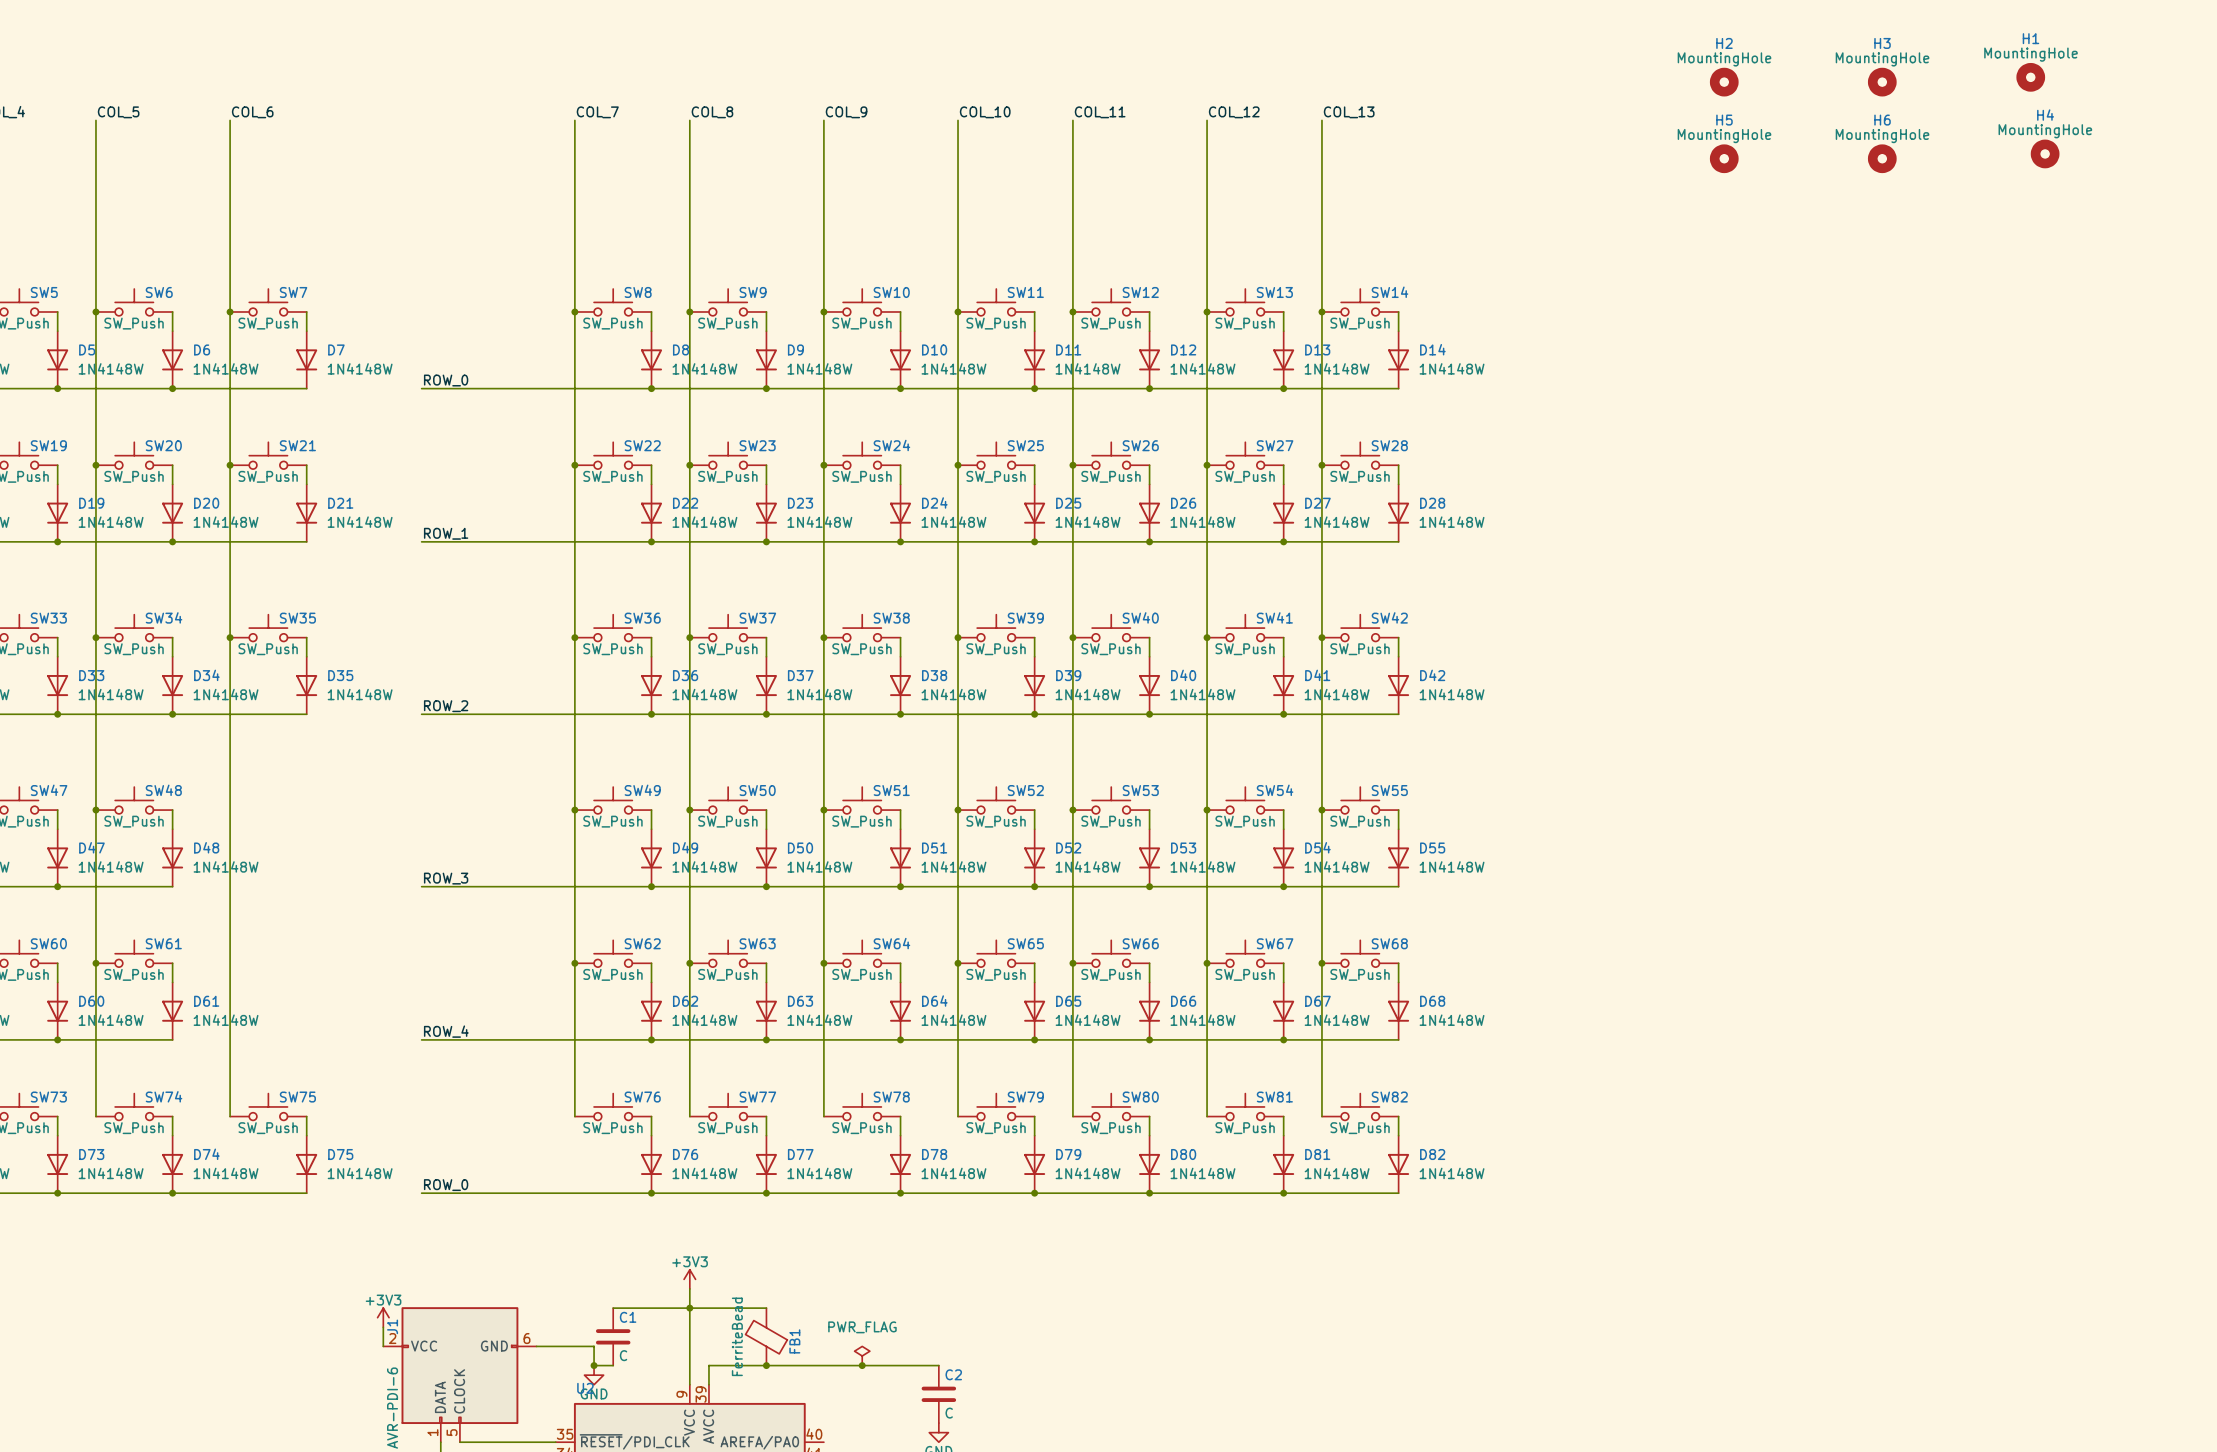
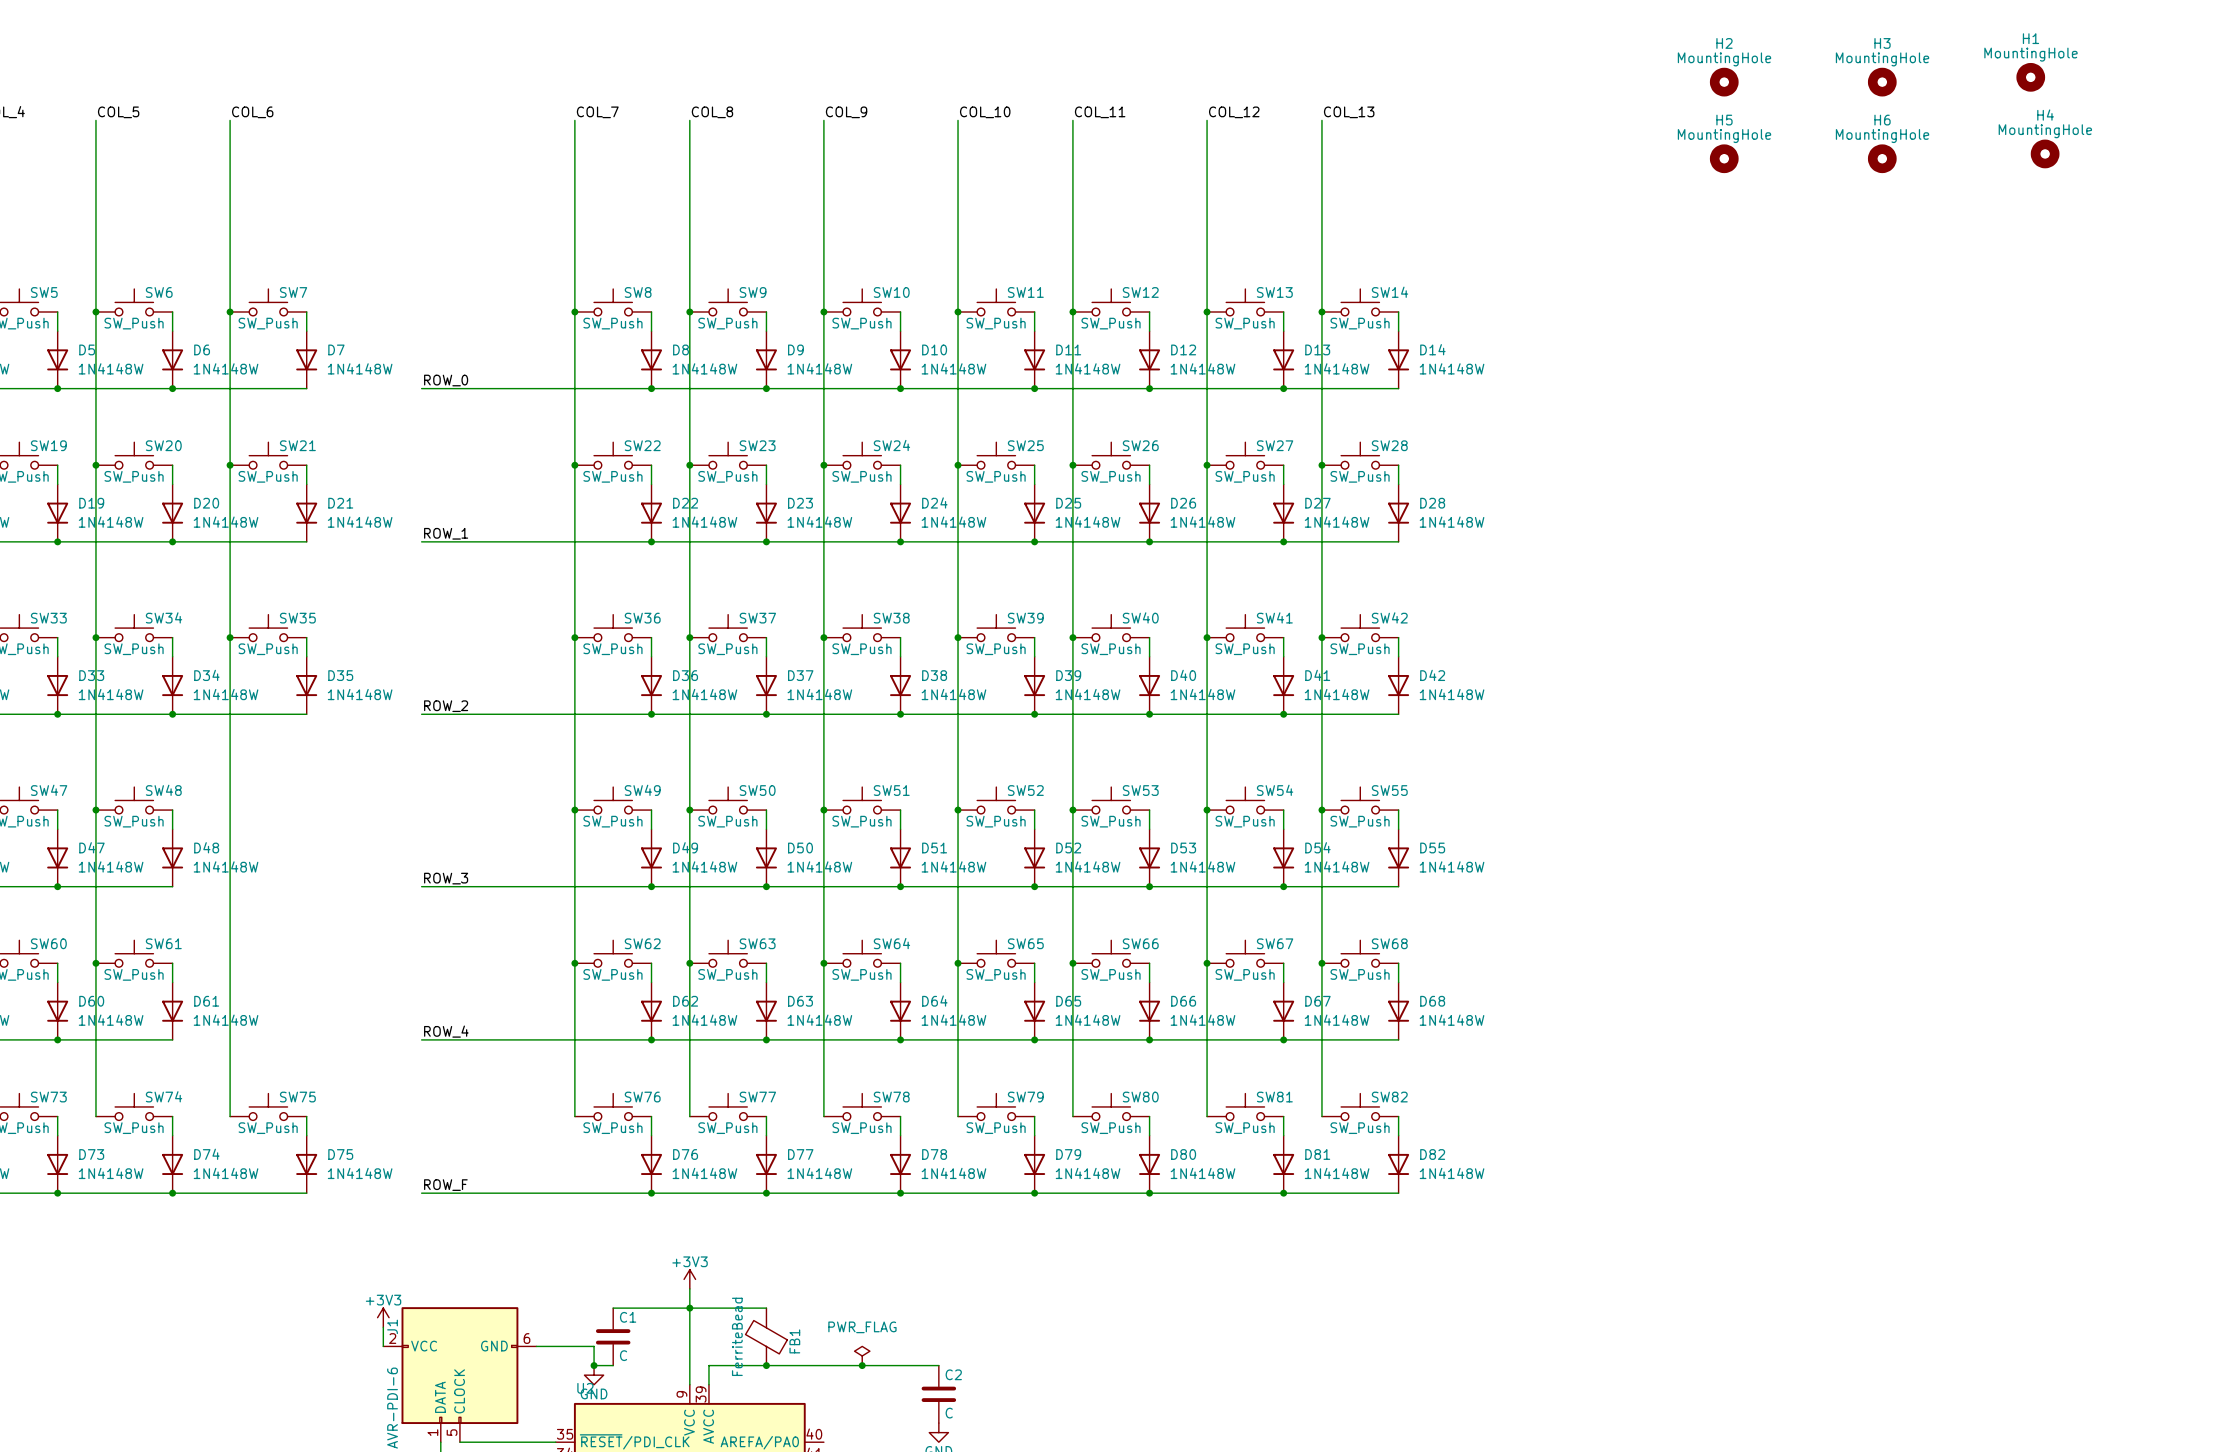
label: ROW_0 (446, 1185) -> ROW_F (445, 1185)

